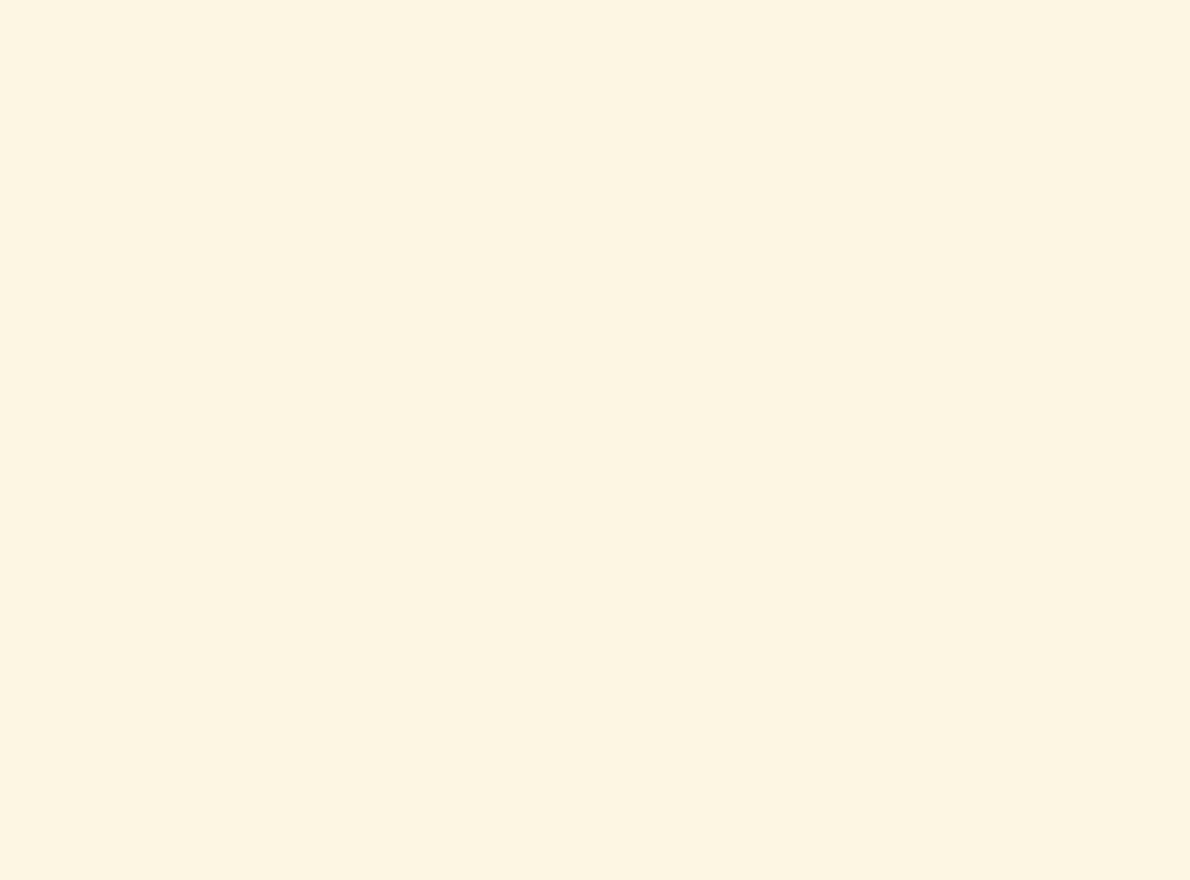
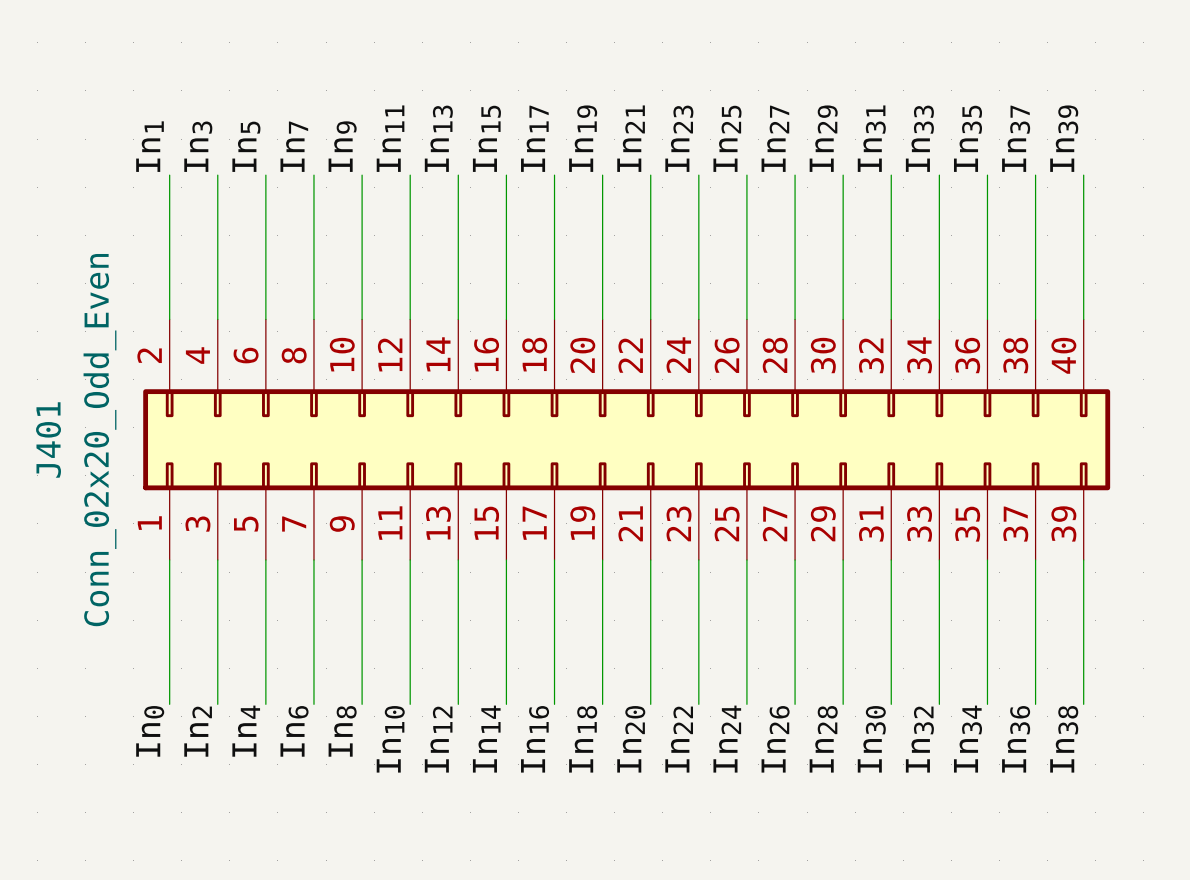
label: none -> In17 (534, 138)
label: none -> In27 (775, 138)
label: none -> In37 (1016, 138)
label: none -> In11 (390, 138)
label: none -> In13 (438, 138)
label: none -> In15 (486, 138)
label: none -> In19 (583, 138)
label: none -> In21 (631, 138)
label: none -> In23 (679, 138)
label: none -> In25 (727, 138)
label: none -> In29 (823, 138)
label: none -> In31 (871, 138)
label: none -> In33 (919, 138)
label: none -> In35 (968, 138)
label: none -> In39 (1064, 138)
label: none -> In7 (294, 146)
label: none -> In1 (150, 146)
label: none -> In3 (198, 146)
label: none -> In5 (246, 146)
label: none -> In9 (342, 146)
wire: none -> (169, 175) (169, 319)
wire: none -> (217, 175) (217, 319)
wire: none -> (265, 175) (265, 319)
wire: none -> (313, 175) (313, 319)
wire: none -> (362, 175) (362, 319)
wire: none -> (410, 175) (410, 319)
wire: none -> (458, 175) (458, 319)
wire: none -> (506, 175) (506, 319)
wire: none -> (554, 175) (554, 319)
wire: none -> (602, 175) (602, 319)
wire: none -> (650, 175) (650, 319)
wire: none -> (698, 175) (698, 319)
wire: none -> (746, 175) (746, 319)
wire: none -> (795, 175) (795, 319)
wire: none -> (843, 175) (843, 319)
wire: none -> (891, 175) (891, 319)
wire: none -> (939, 175) (939, 319)
wire: none -> (987, 175) (987, 319)
wire: none -> (1035, 175) (1035, 319)
wire: none -> (1083, 175) (1083, 319)
J401: none -> Conn_02x20_Odd_Even (626, 439)
wire: none -> (169, 560) (169, 704)
wire: none -> (217, 560) (217, 704)
wire: none -> (265, 560) (265, 704)
wire: none -> (313, 560) (313, 704)
wire: none -> (362, 560) (362, 704)
wire: none -> (410, 560) (410, 704)
wire: none -> (458, 560) (458, 704)
wire: none -> (506, 560) (506, 704)
wire: none -> (554, 560) (554, 704)
wire: none -> (602, 560) (602, 704)
wire: none -> (650, 560) (650, 704)
wire: none -> (698, 560) (698, 704)
wire: none -> (746, 560) (746, 704)
wire: none -> (795, 560) (795, 704)
wire: none -> (843, 560) (843, 704)
wire: none -> (891, 560) (891, 704)
wire: none -> (939, 560) (939, 704)
wire: none -> (987, 560) (987, 704)
wire: none -> (1035, 560) (1035, 704)
wire: none -> (1083, 560) (1083, 704)
label: none -> In0 (150, 731)
label: none -> In2 (198, 731)
label: none -> In4 (246, 731)
label: none -> In6 (294, 731)
label: none -> In8 (342, 731)
label: none -> In14 (486, 739)
label: none -> In24 (727, 739)
label: none -> In34 (968, 739)
label: none -> In10 (390, 739)
label: none -> In12 (438, 739)
label: none -> In16 (535, 739)
label: none -> In18 (583, 739)
label: none -> In20 (631, 739)
label: none -> In22 (679, 739)
label: none -> In26 (775, 739)
label: none -> In28 (823, 739)
label: none -> In30 (871, 739)
label: none -> In32 (919, 739)
label: none -> In36 (1016, 739)
label: none -> In38 (1064, 739)

